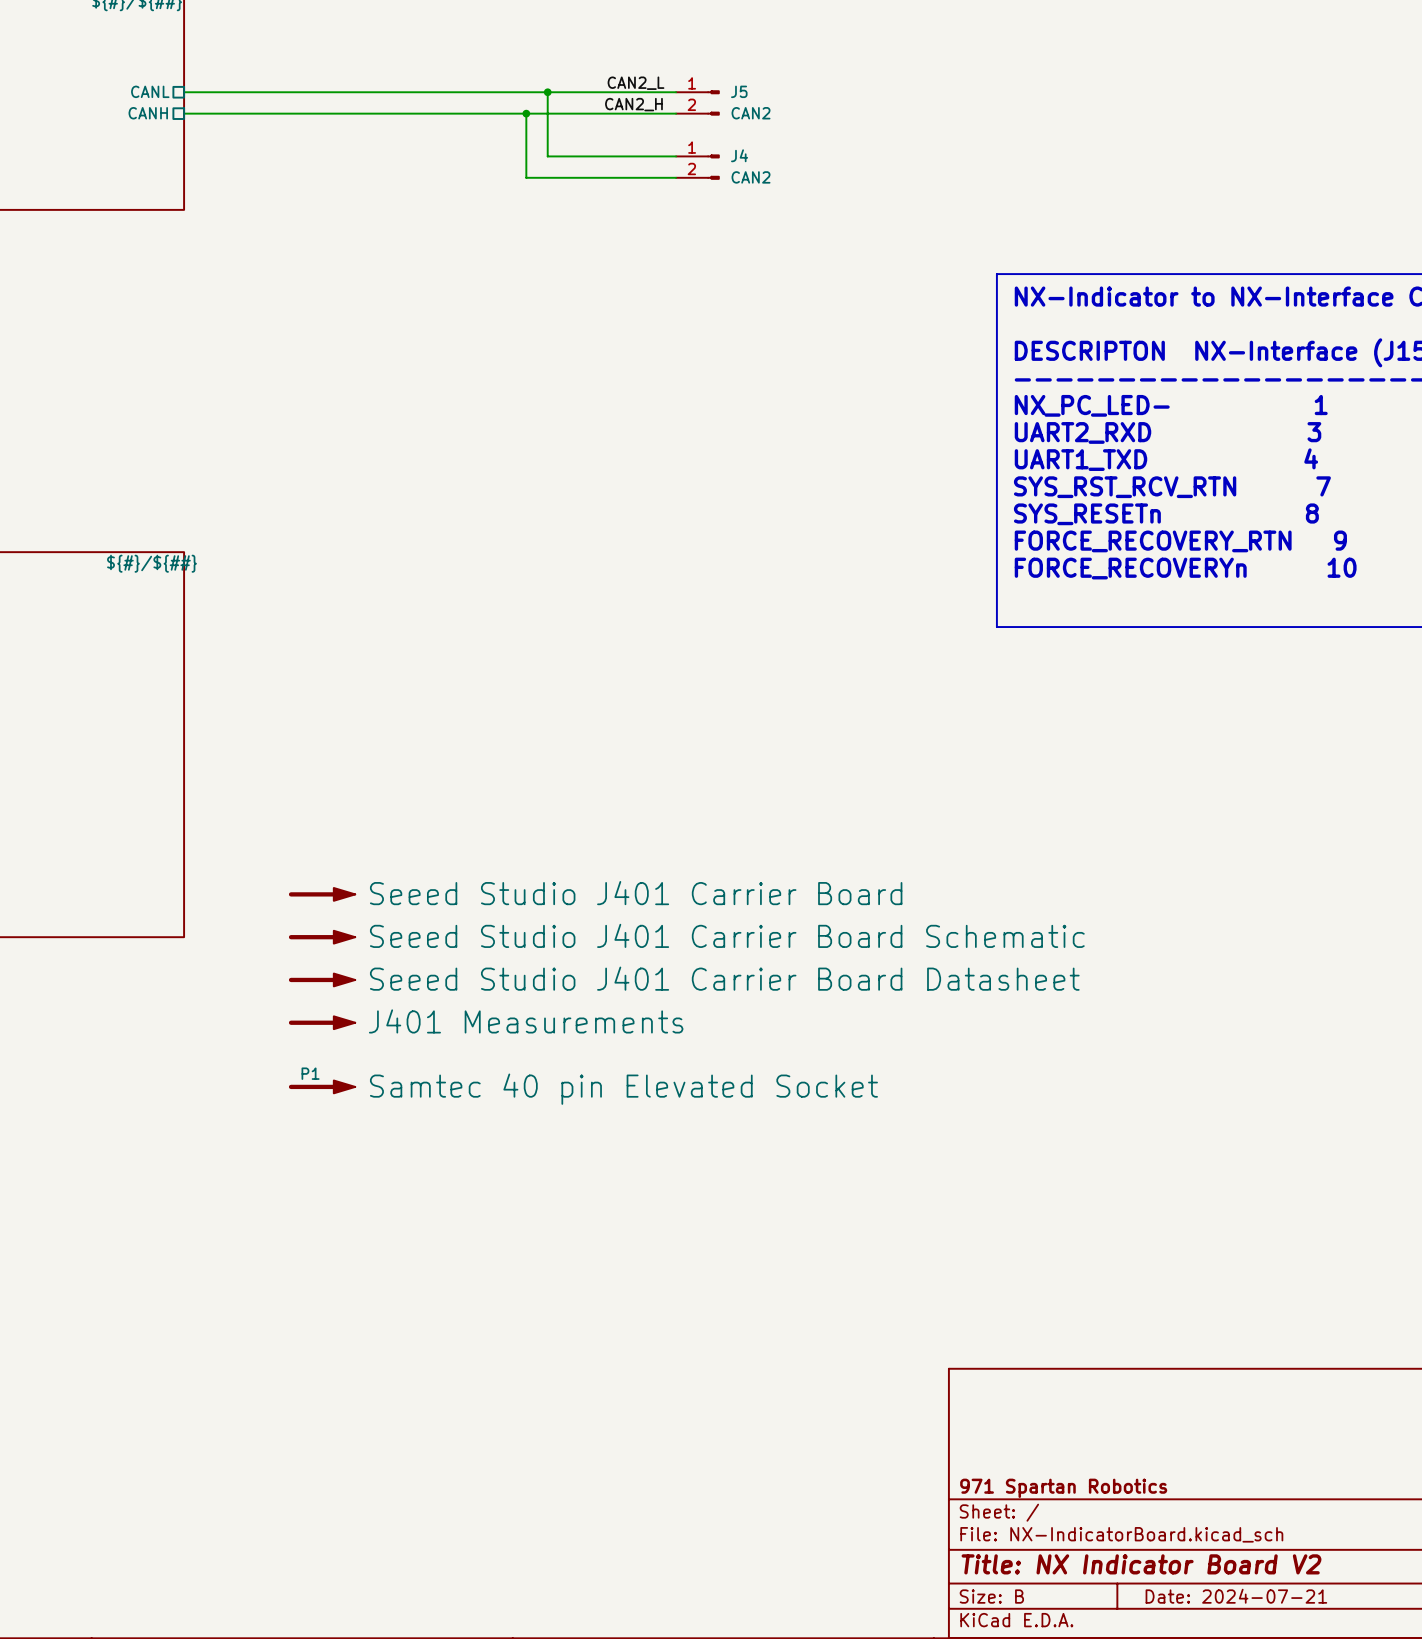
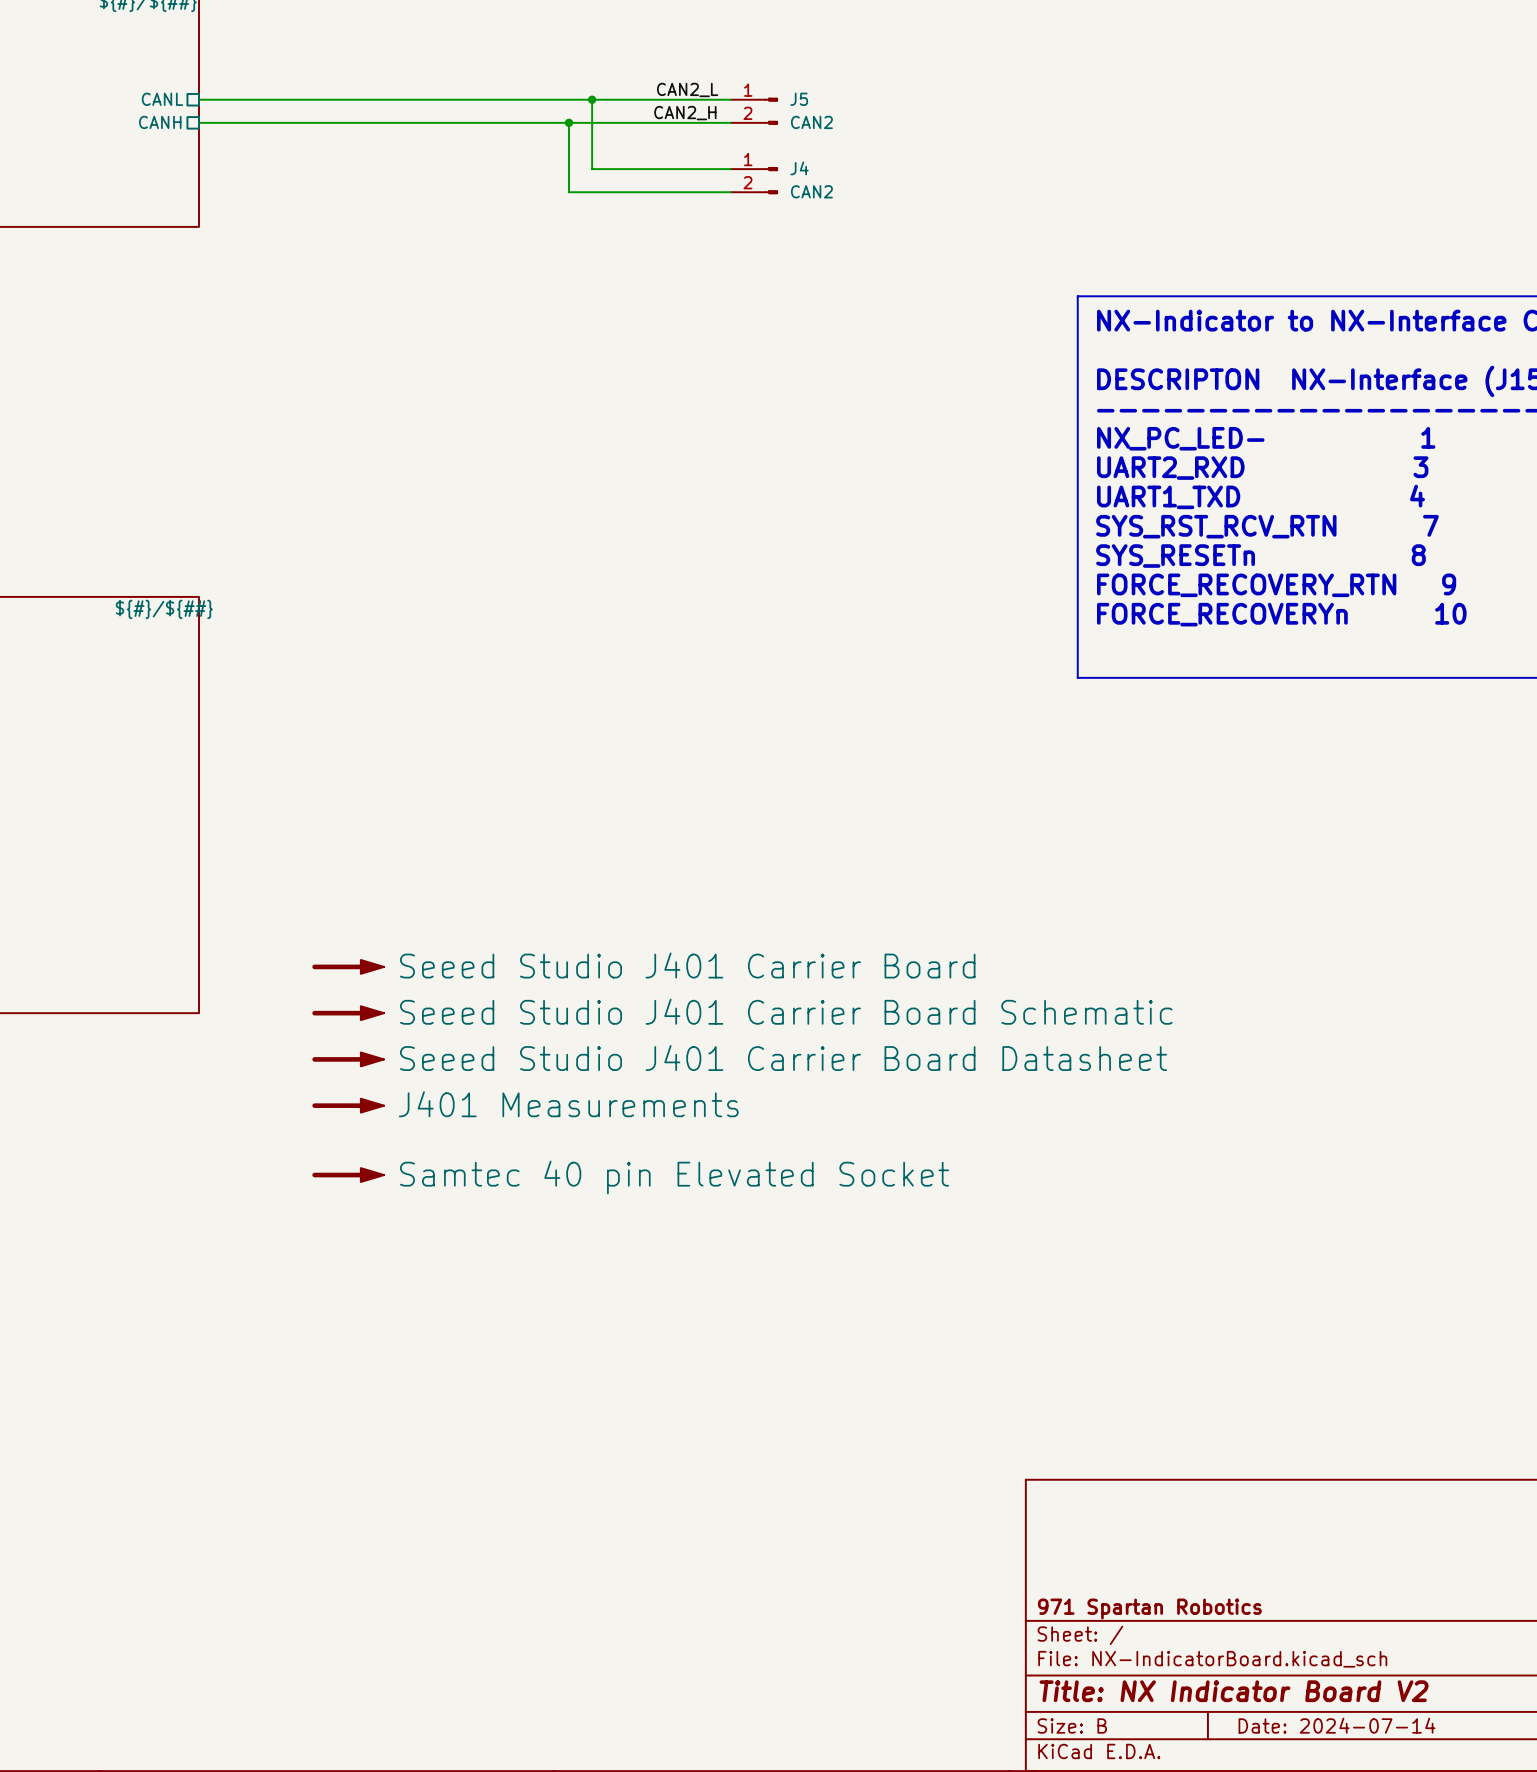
P1 name: P1 (310, 1073) -> none
title block: Date: 2024-07-21 (1236, 1596) -> Date: 2024-07-14 (1336, 1725)

